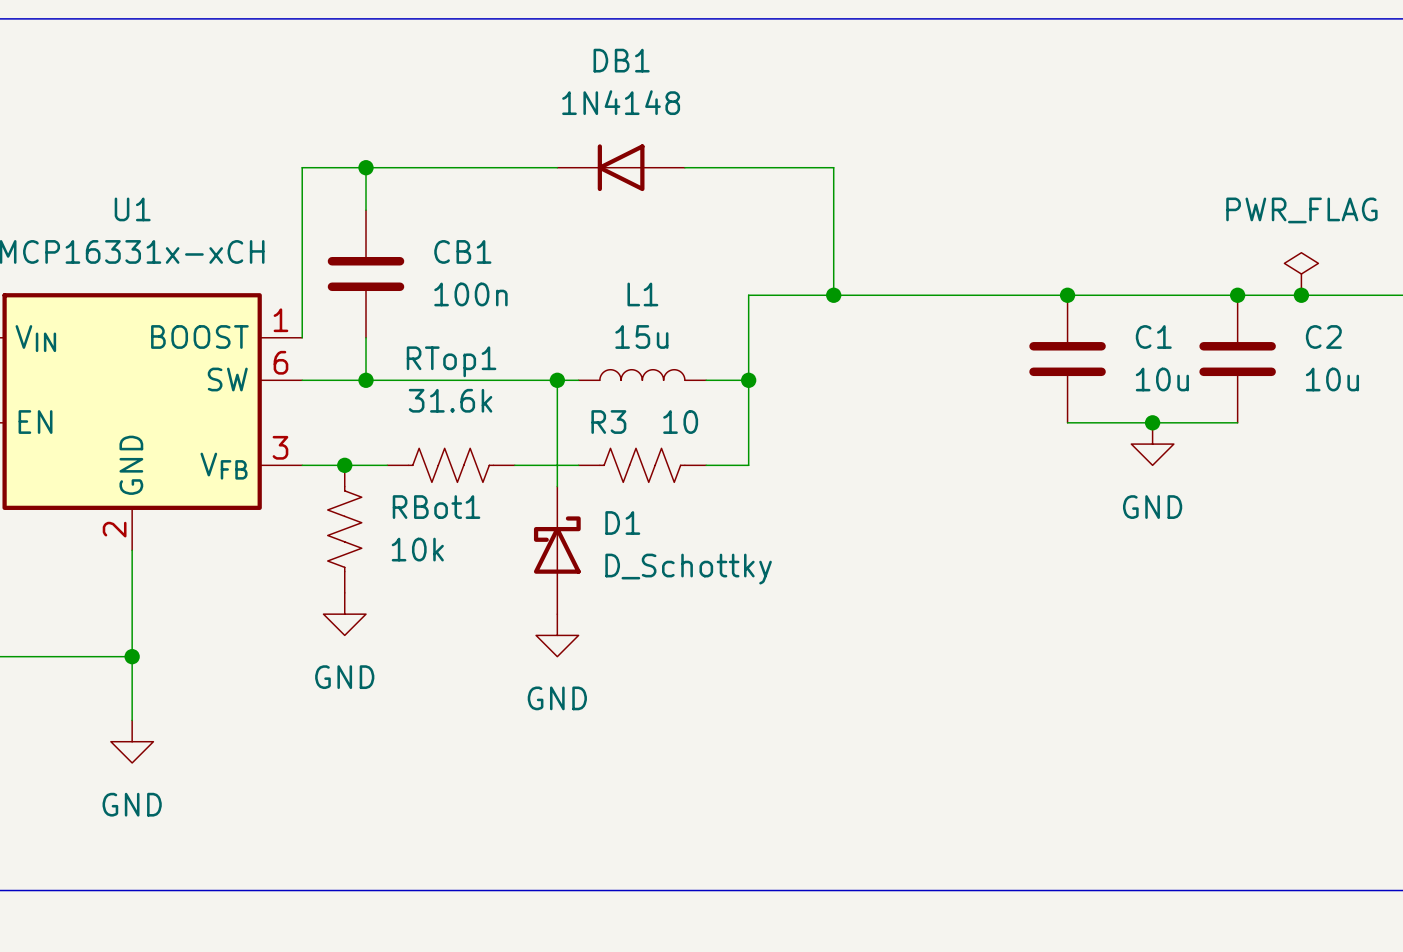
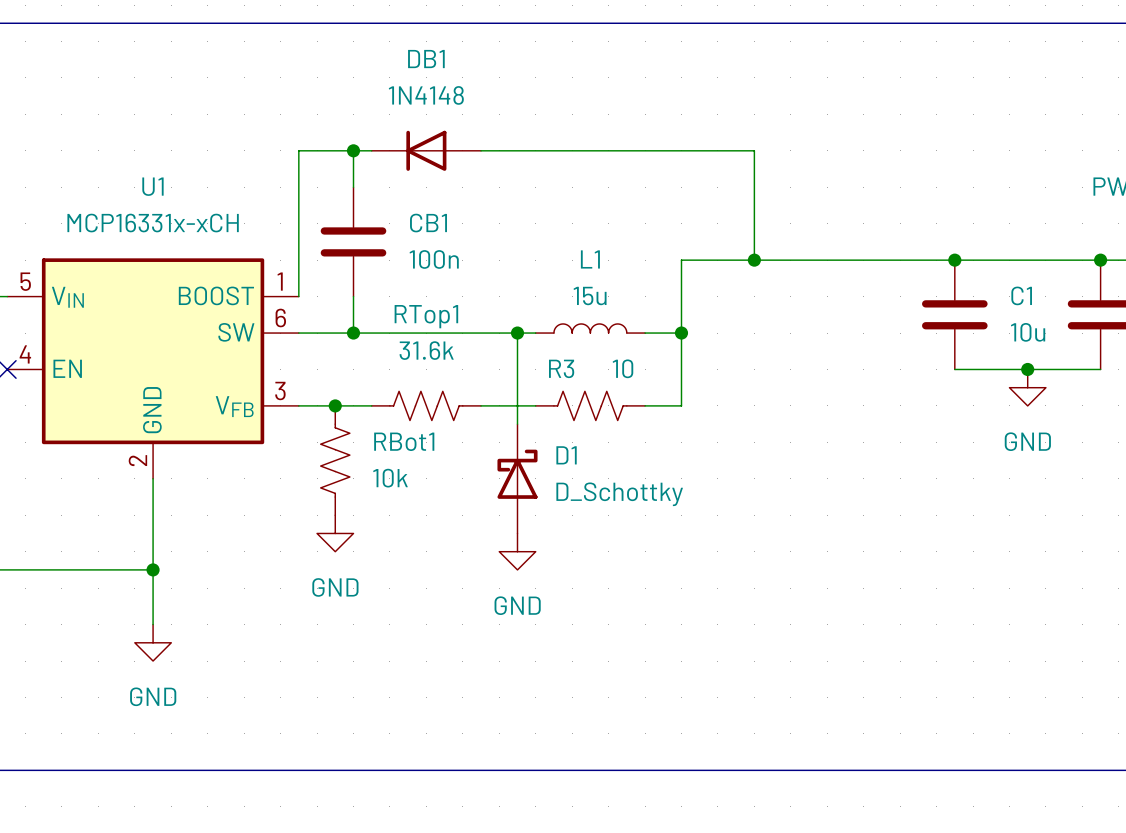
DB1 position: (621, 167) -> (426, 150)

